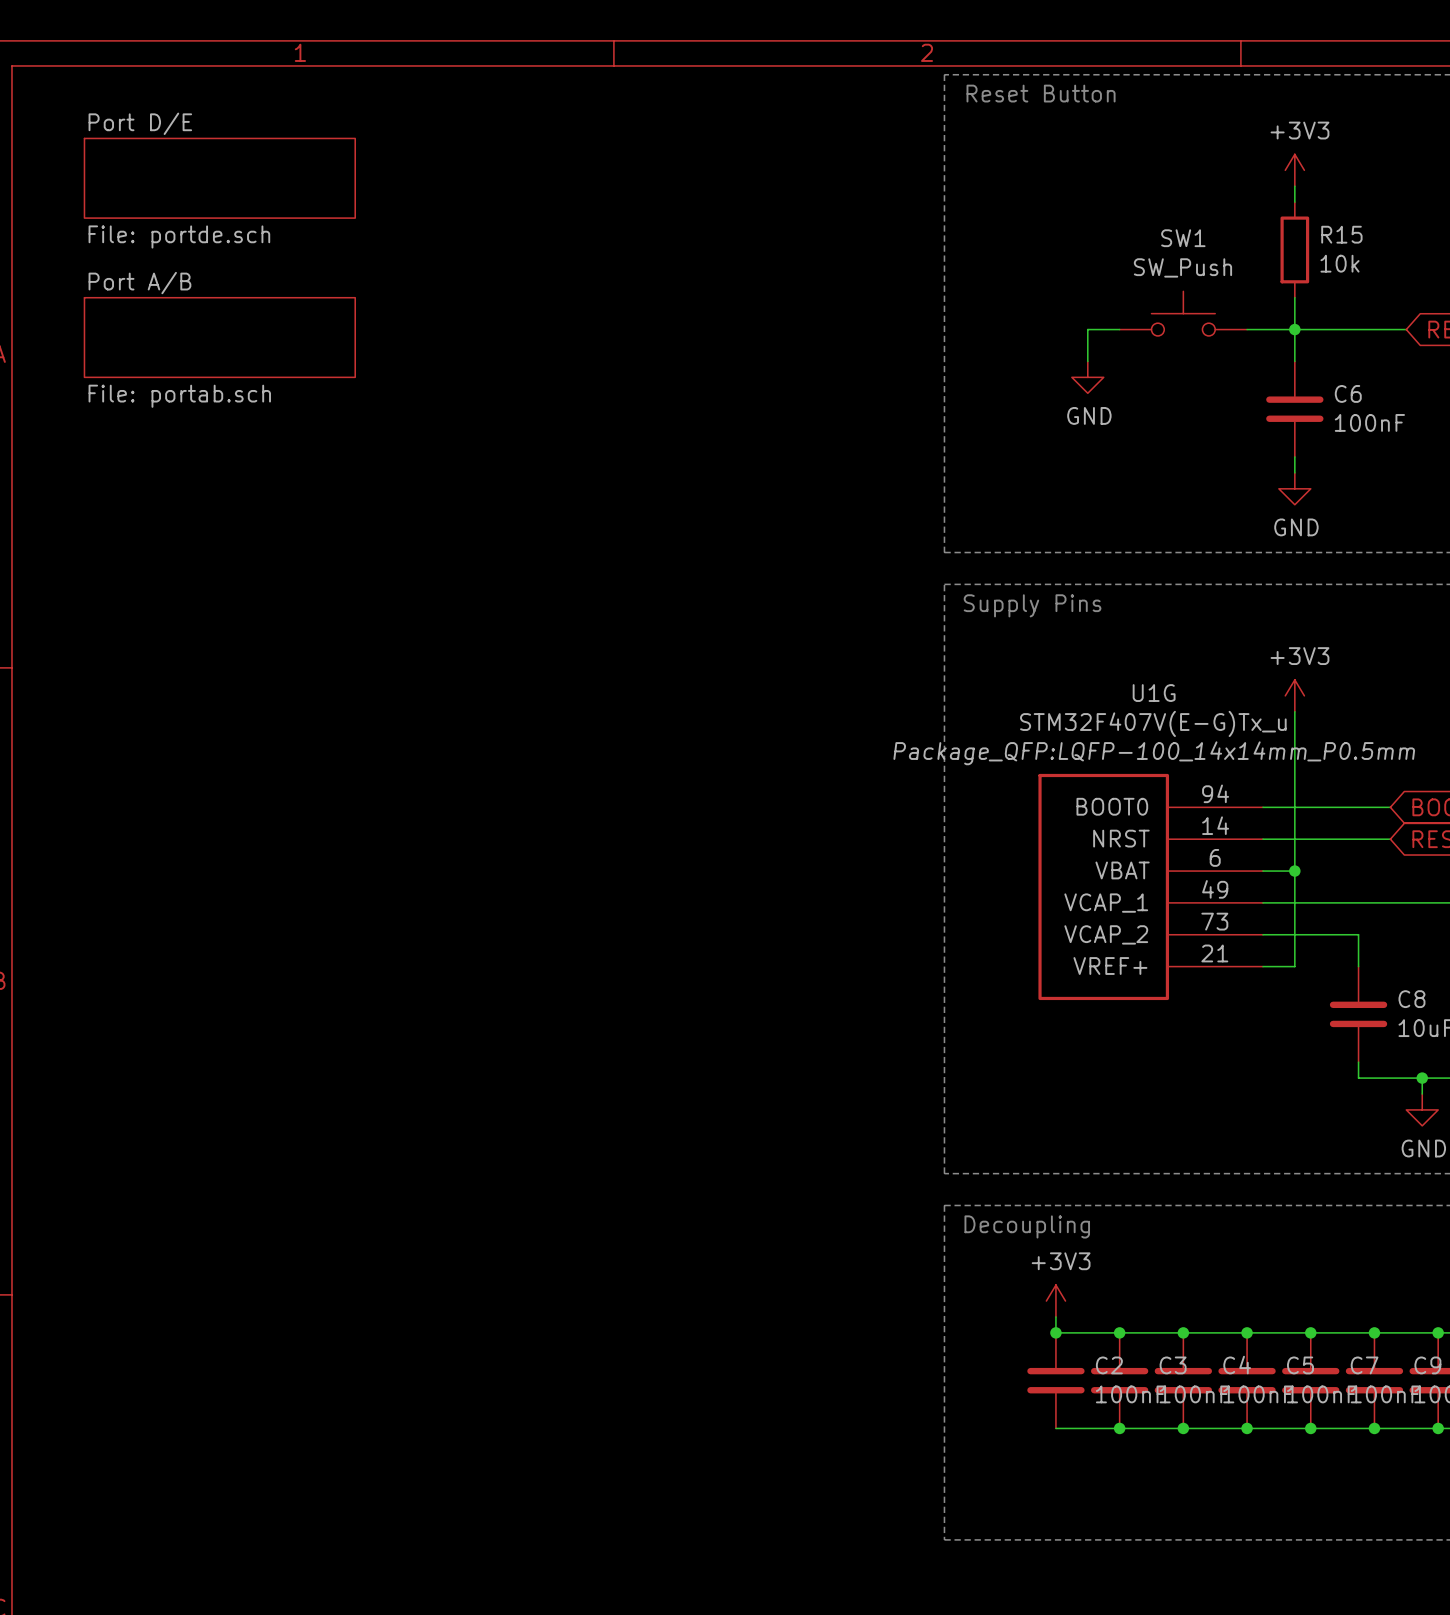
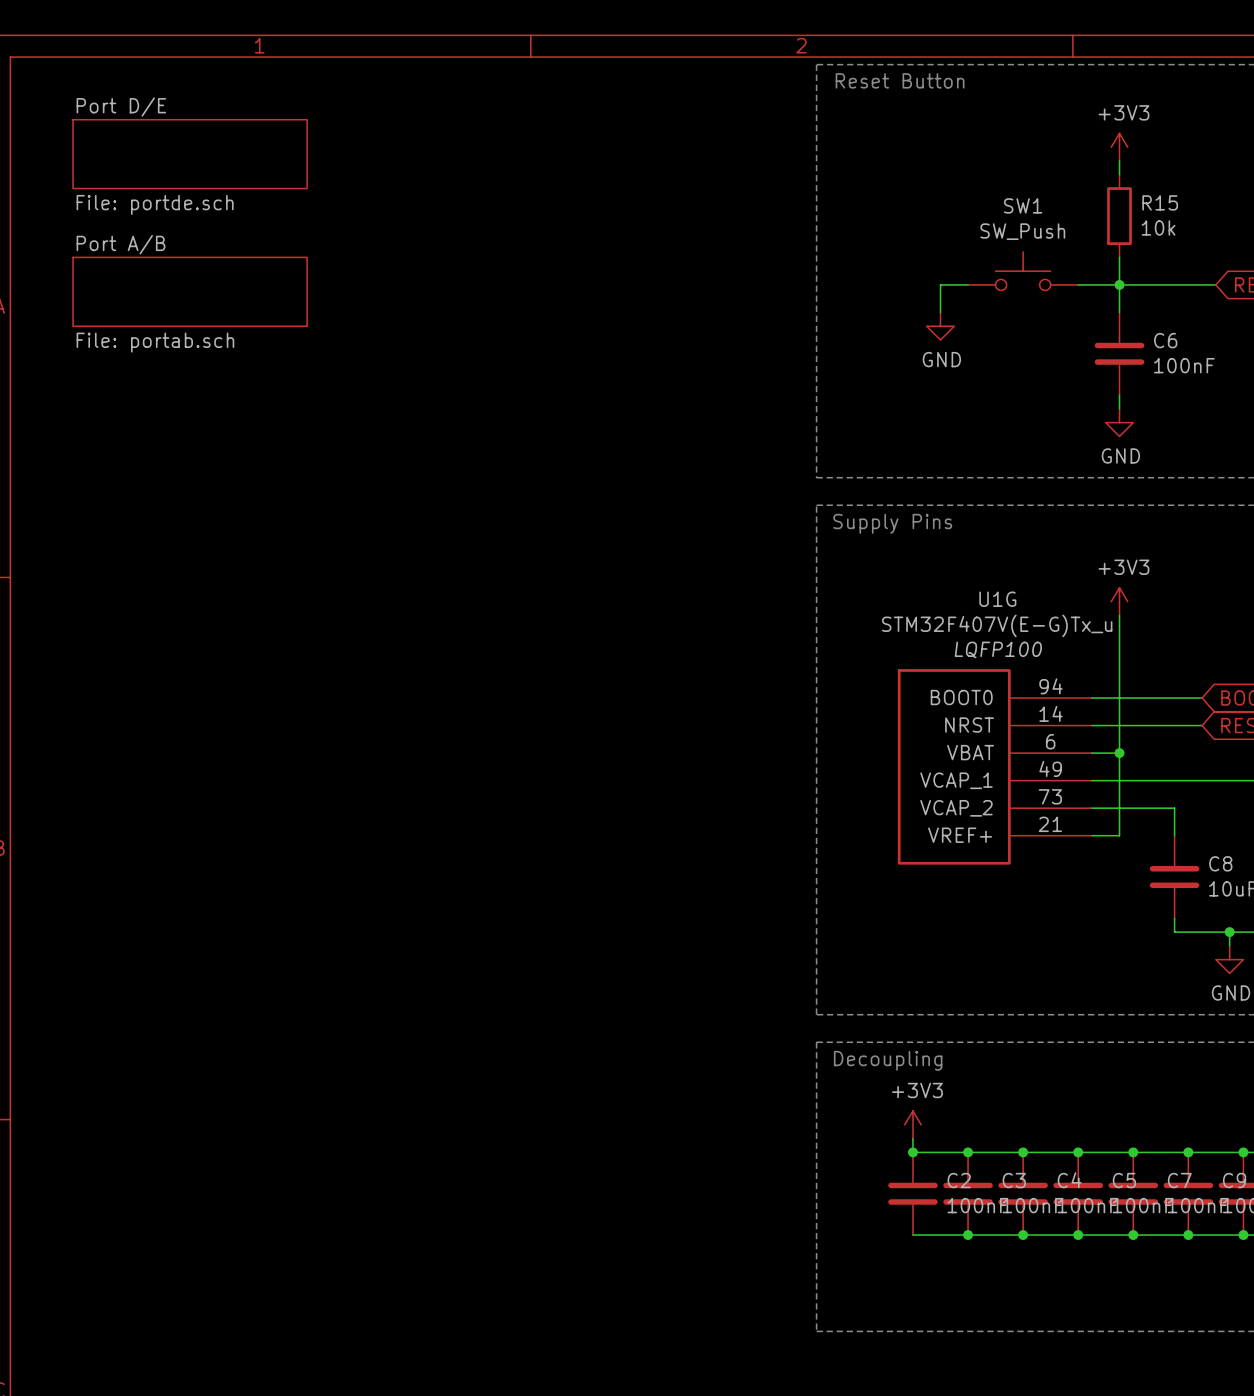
U1G text: Package_QFP:LQFP-100_14x14mm_P0.5mm (1154, 753) -> LQFP100 (998, 649)

